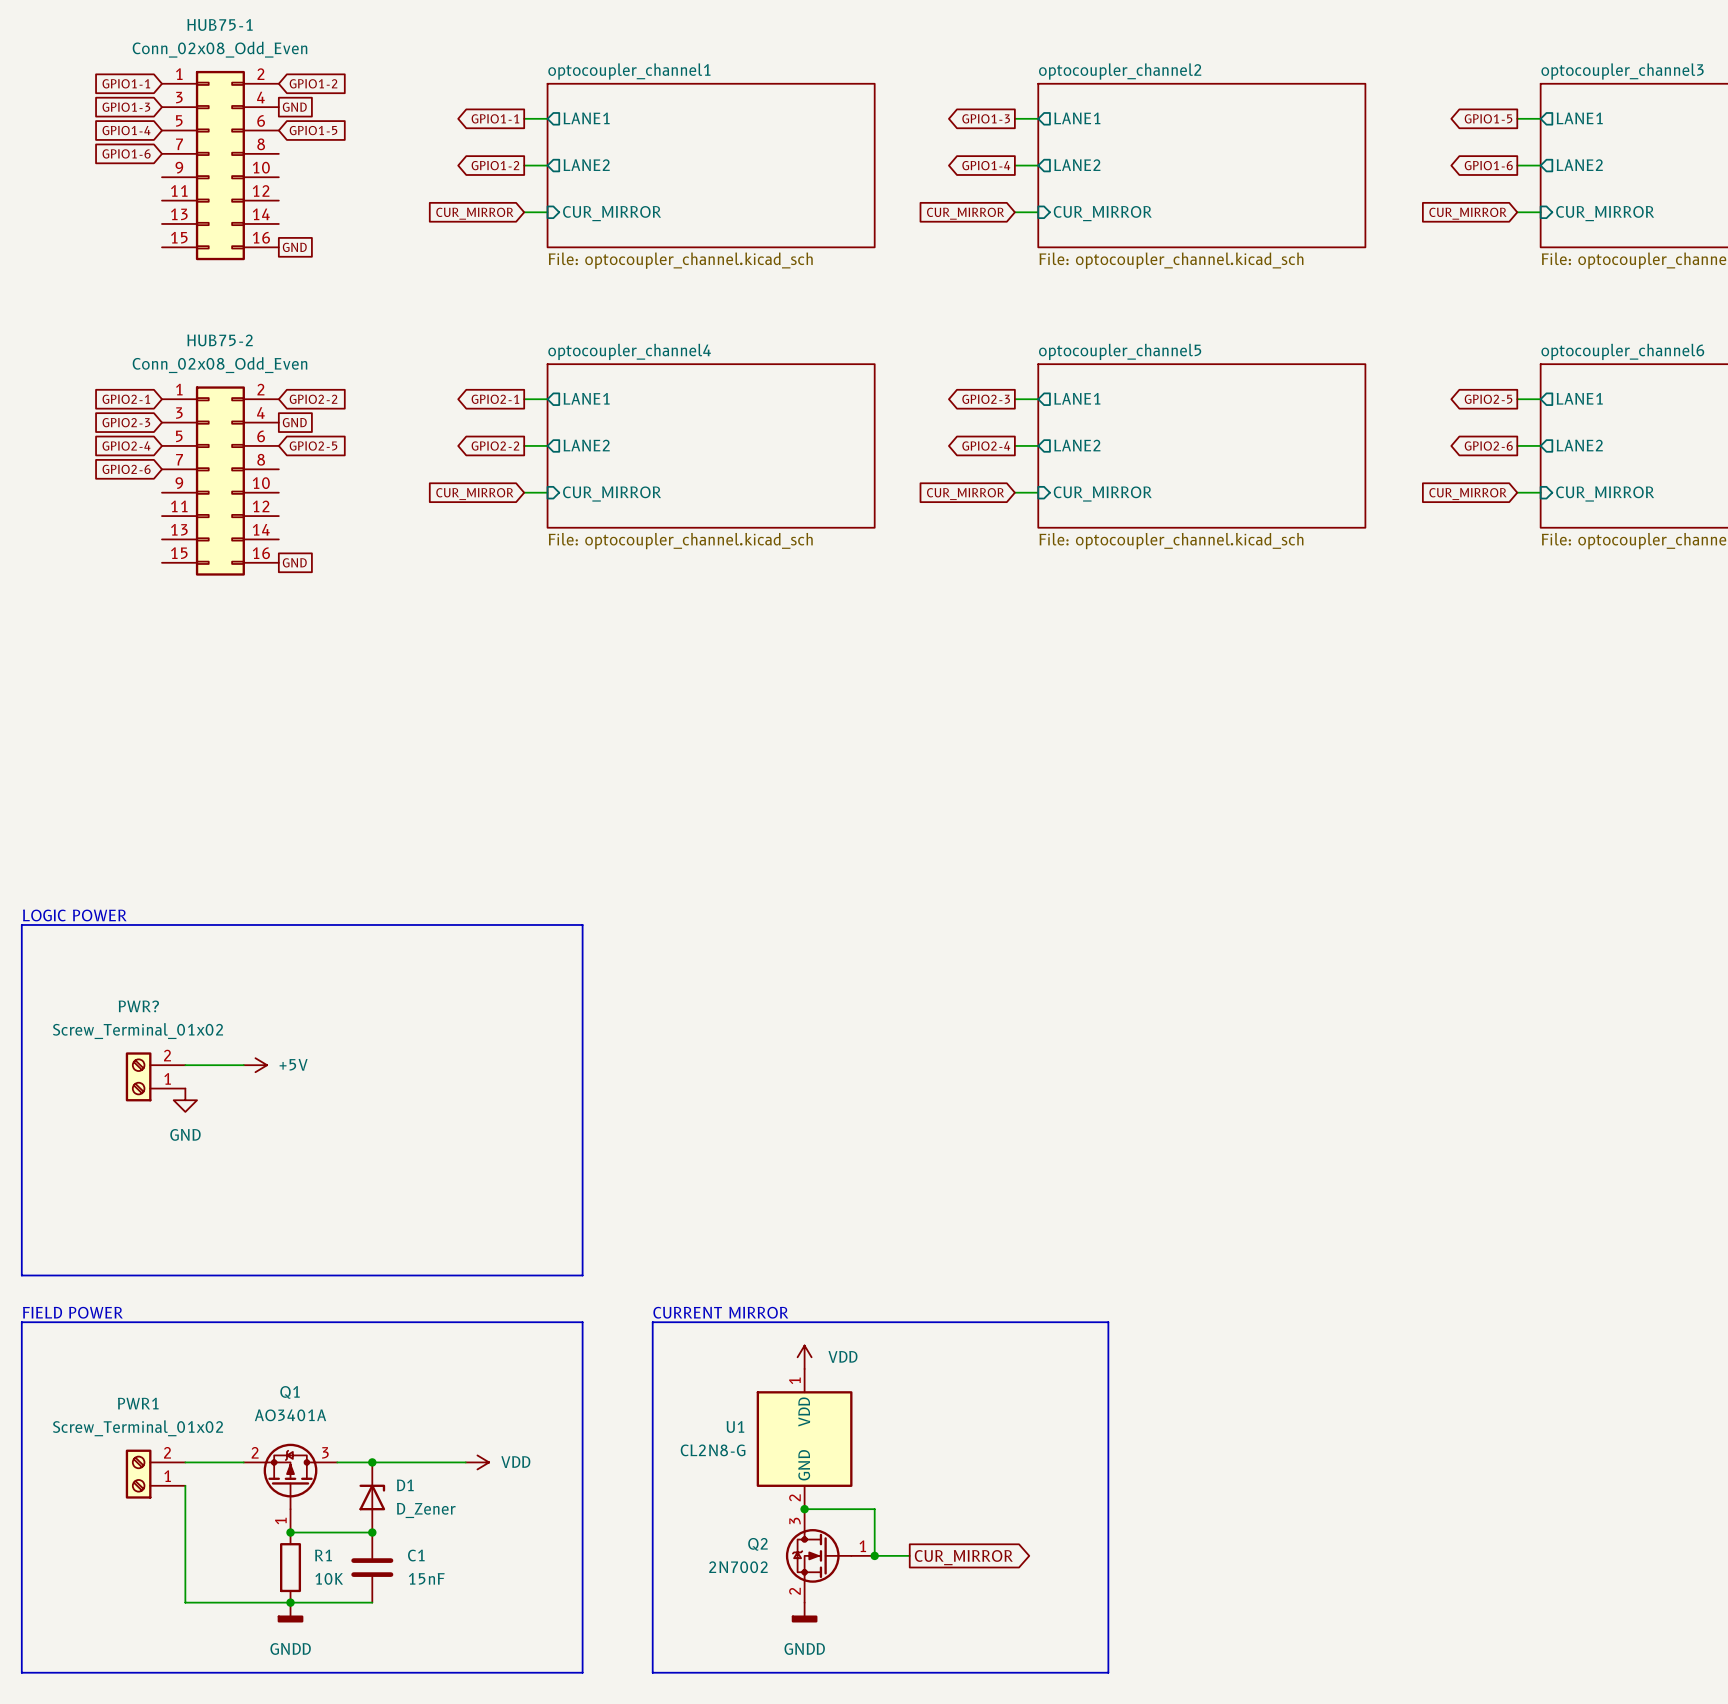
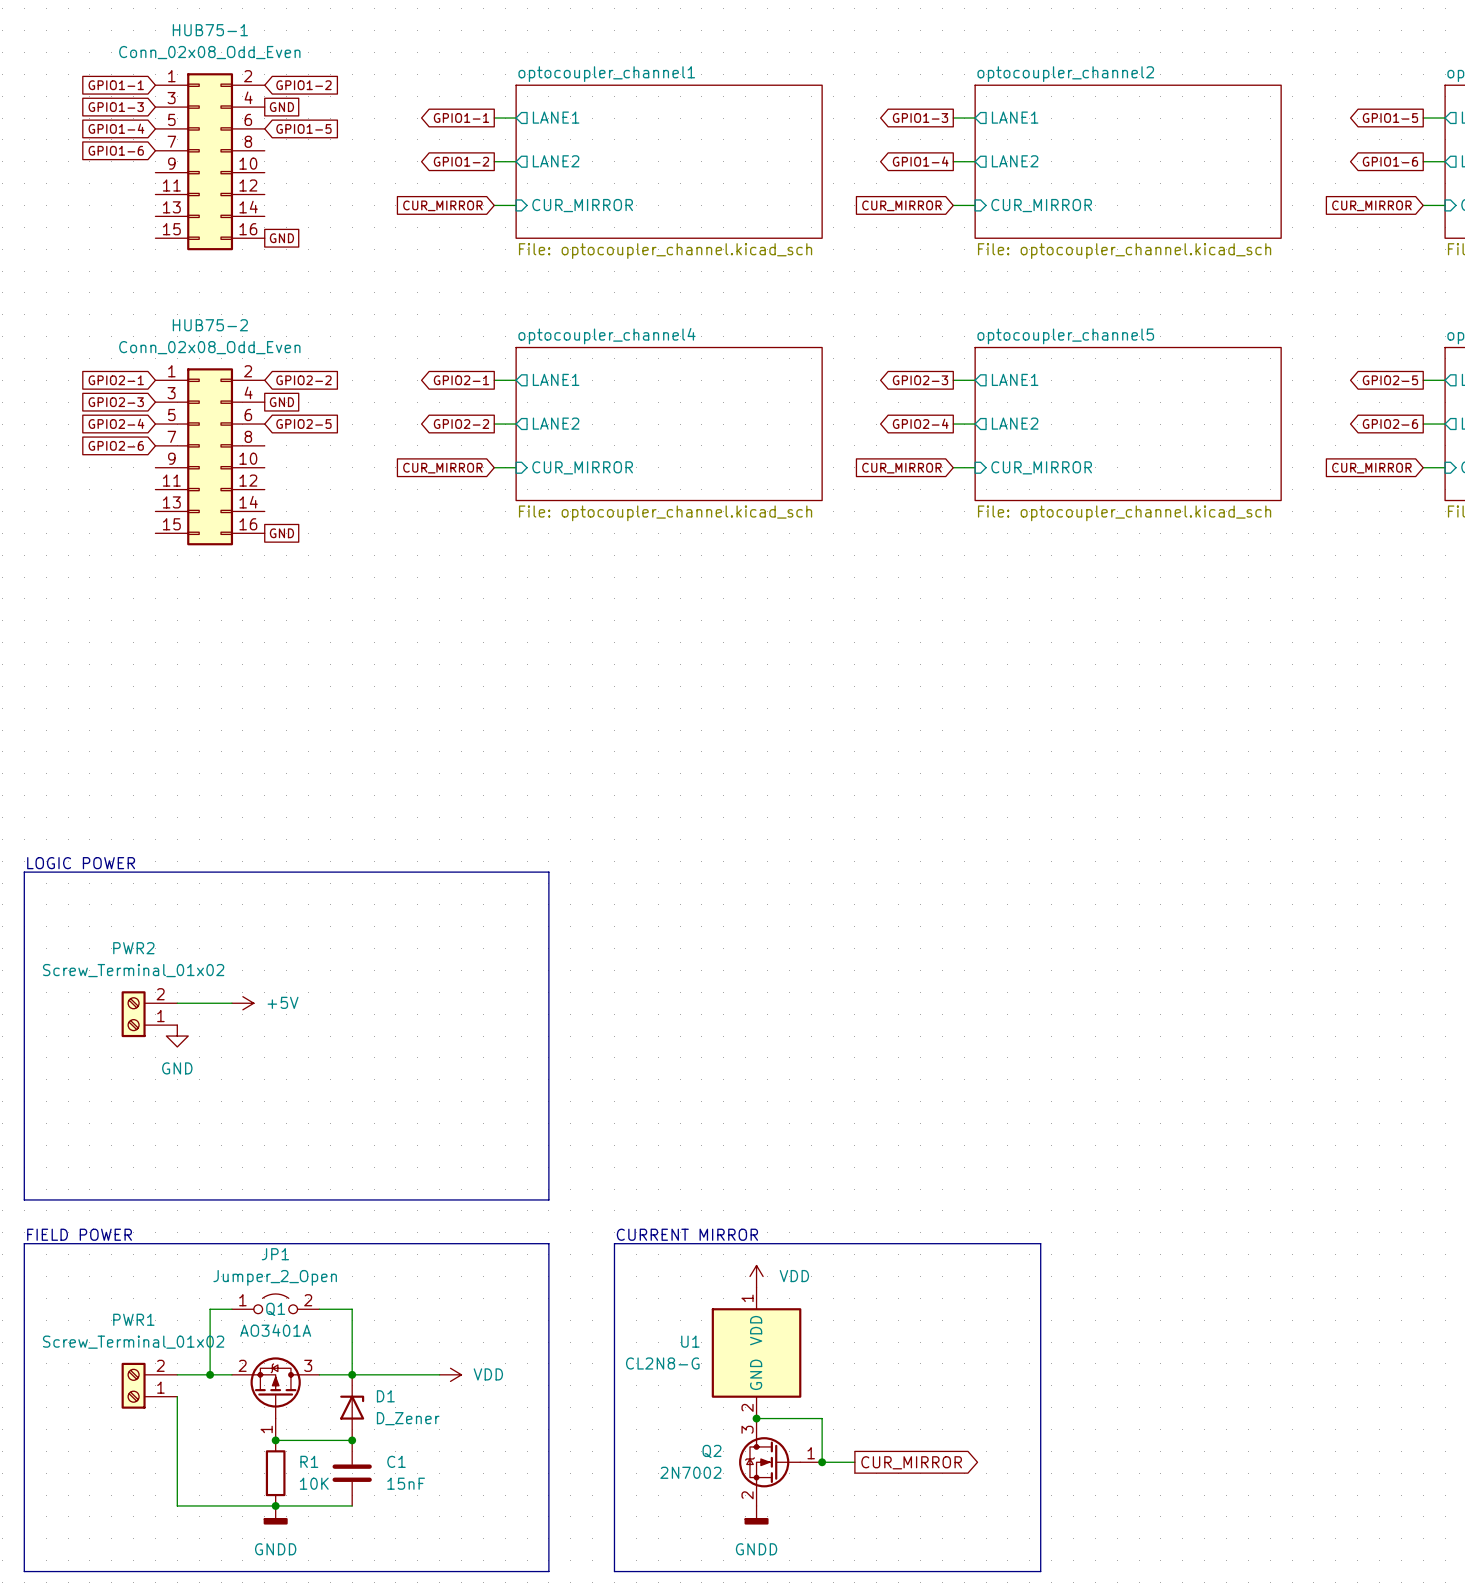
PWR? name: PWR? (138, 1006) -> PWR2 (133, 948)
JP1: none -> Jumper_2_Open (275, 1303)
wire: none -> (231, 1309) (210, 1309) (210, 1374)
wire: none -> (319, 1309) (352, 1309) (352, 1374)
junction: none -> (210, 1374)

